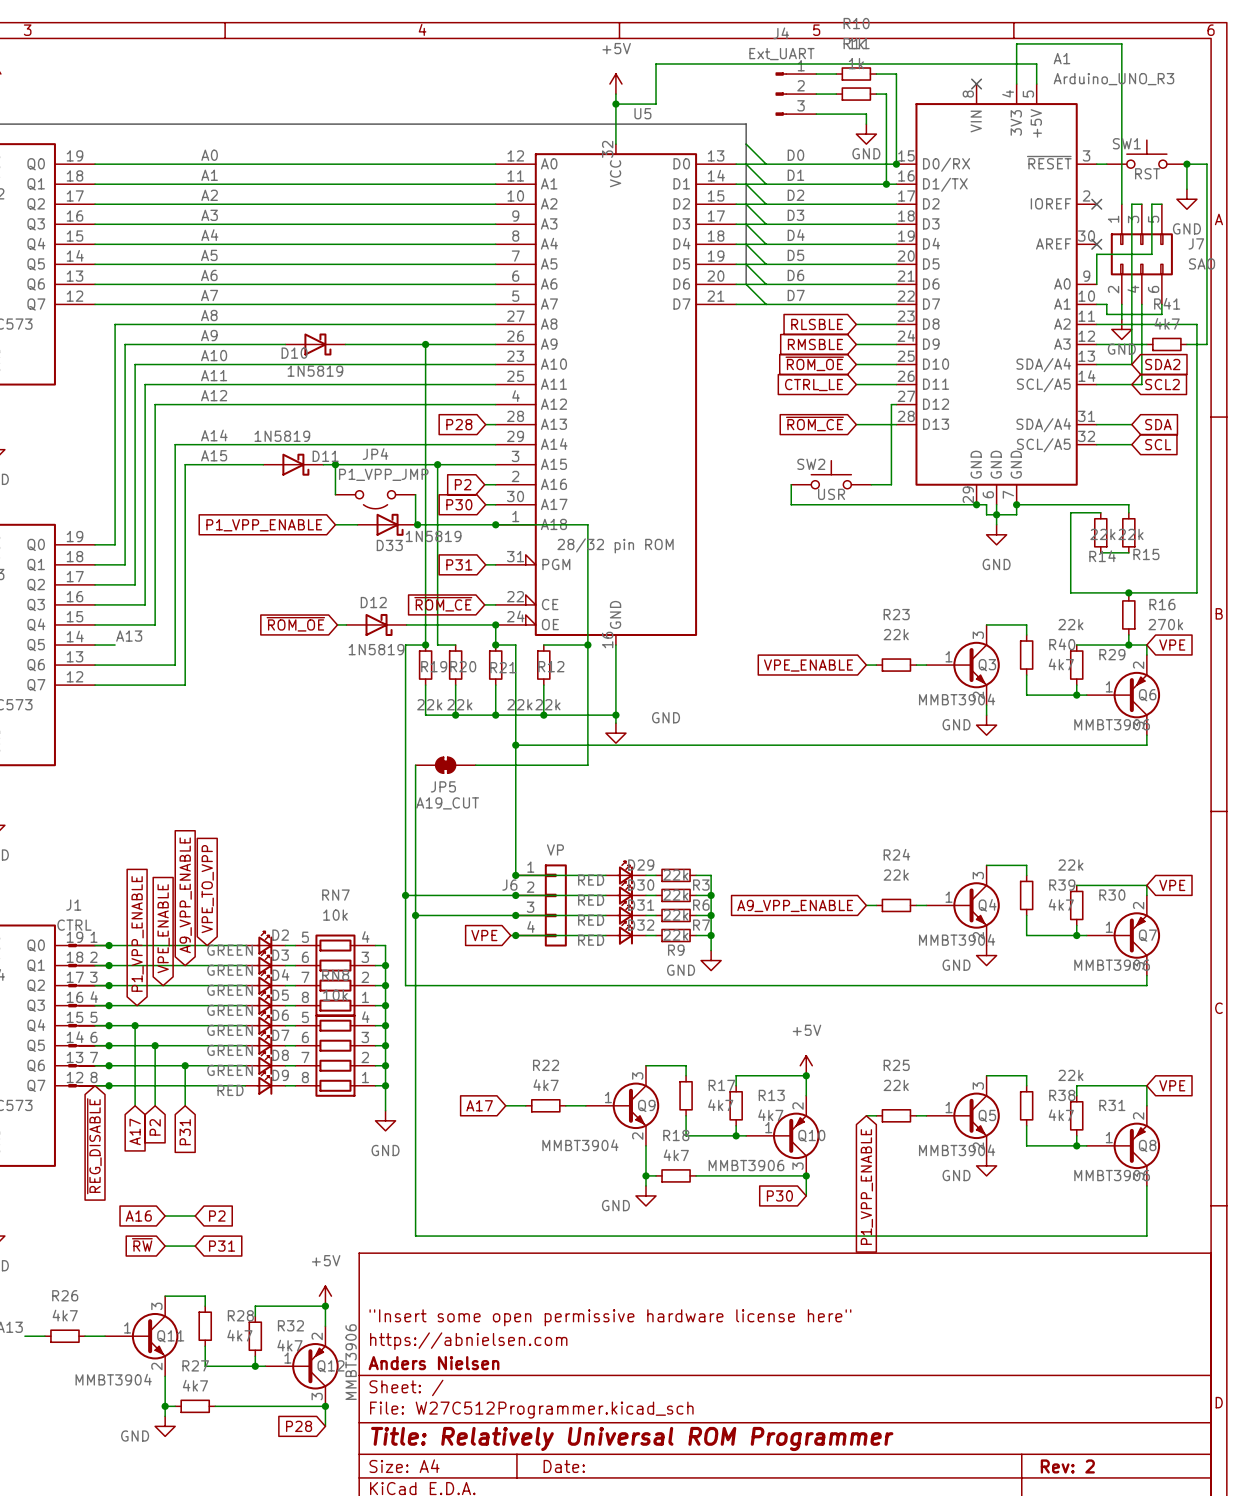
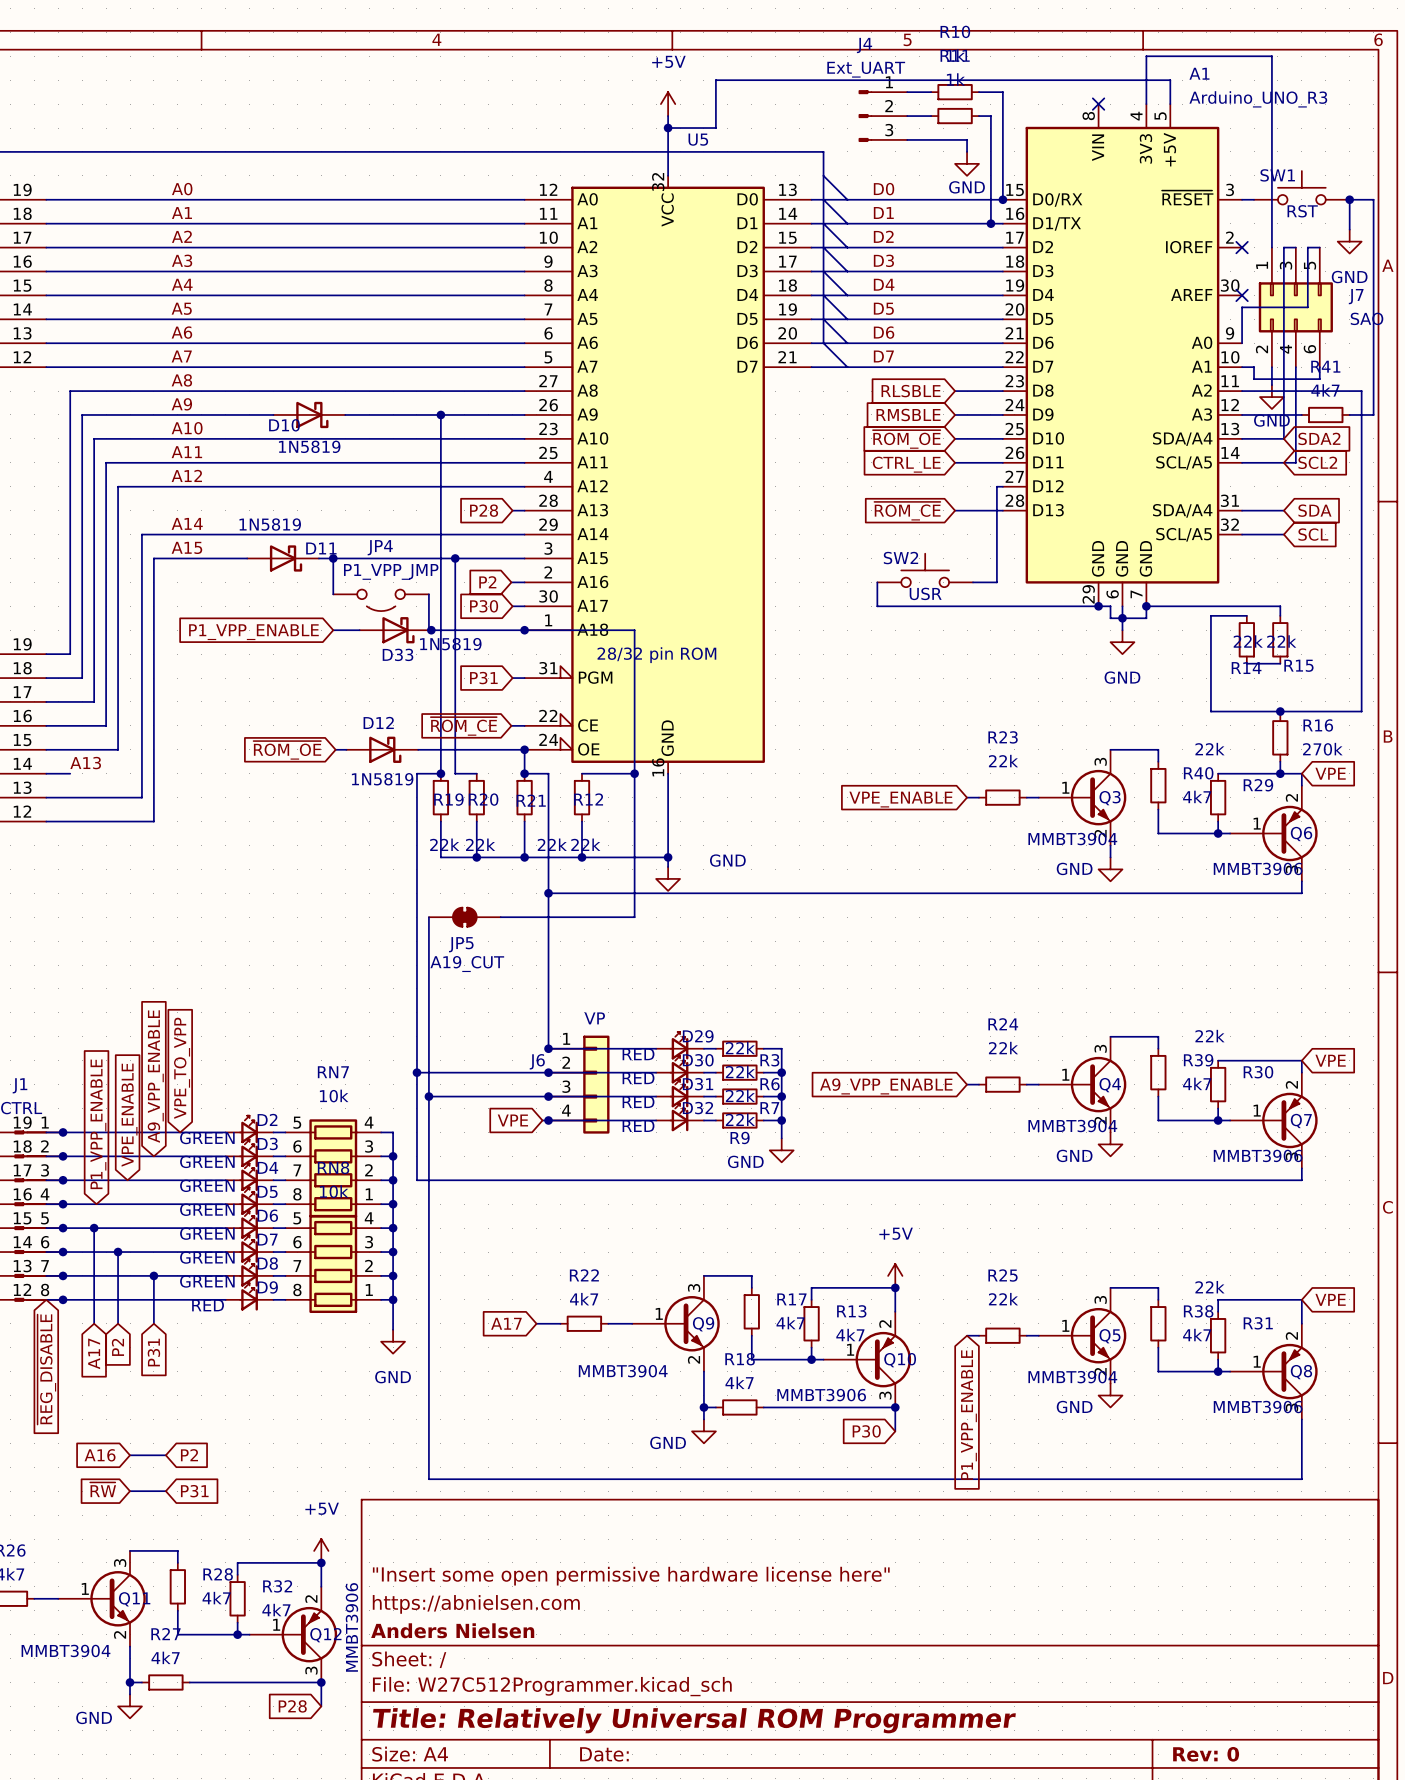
title block: Rev: 2 (1067, 1466) -> Rev: 0 (1206, 1754)

